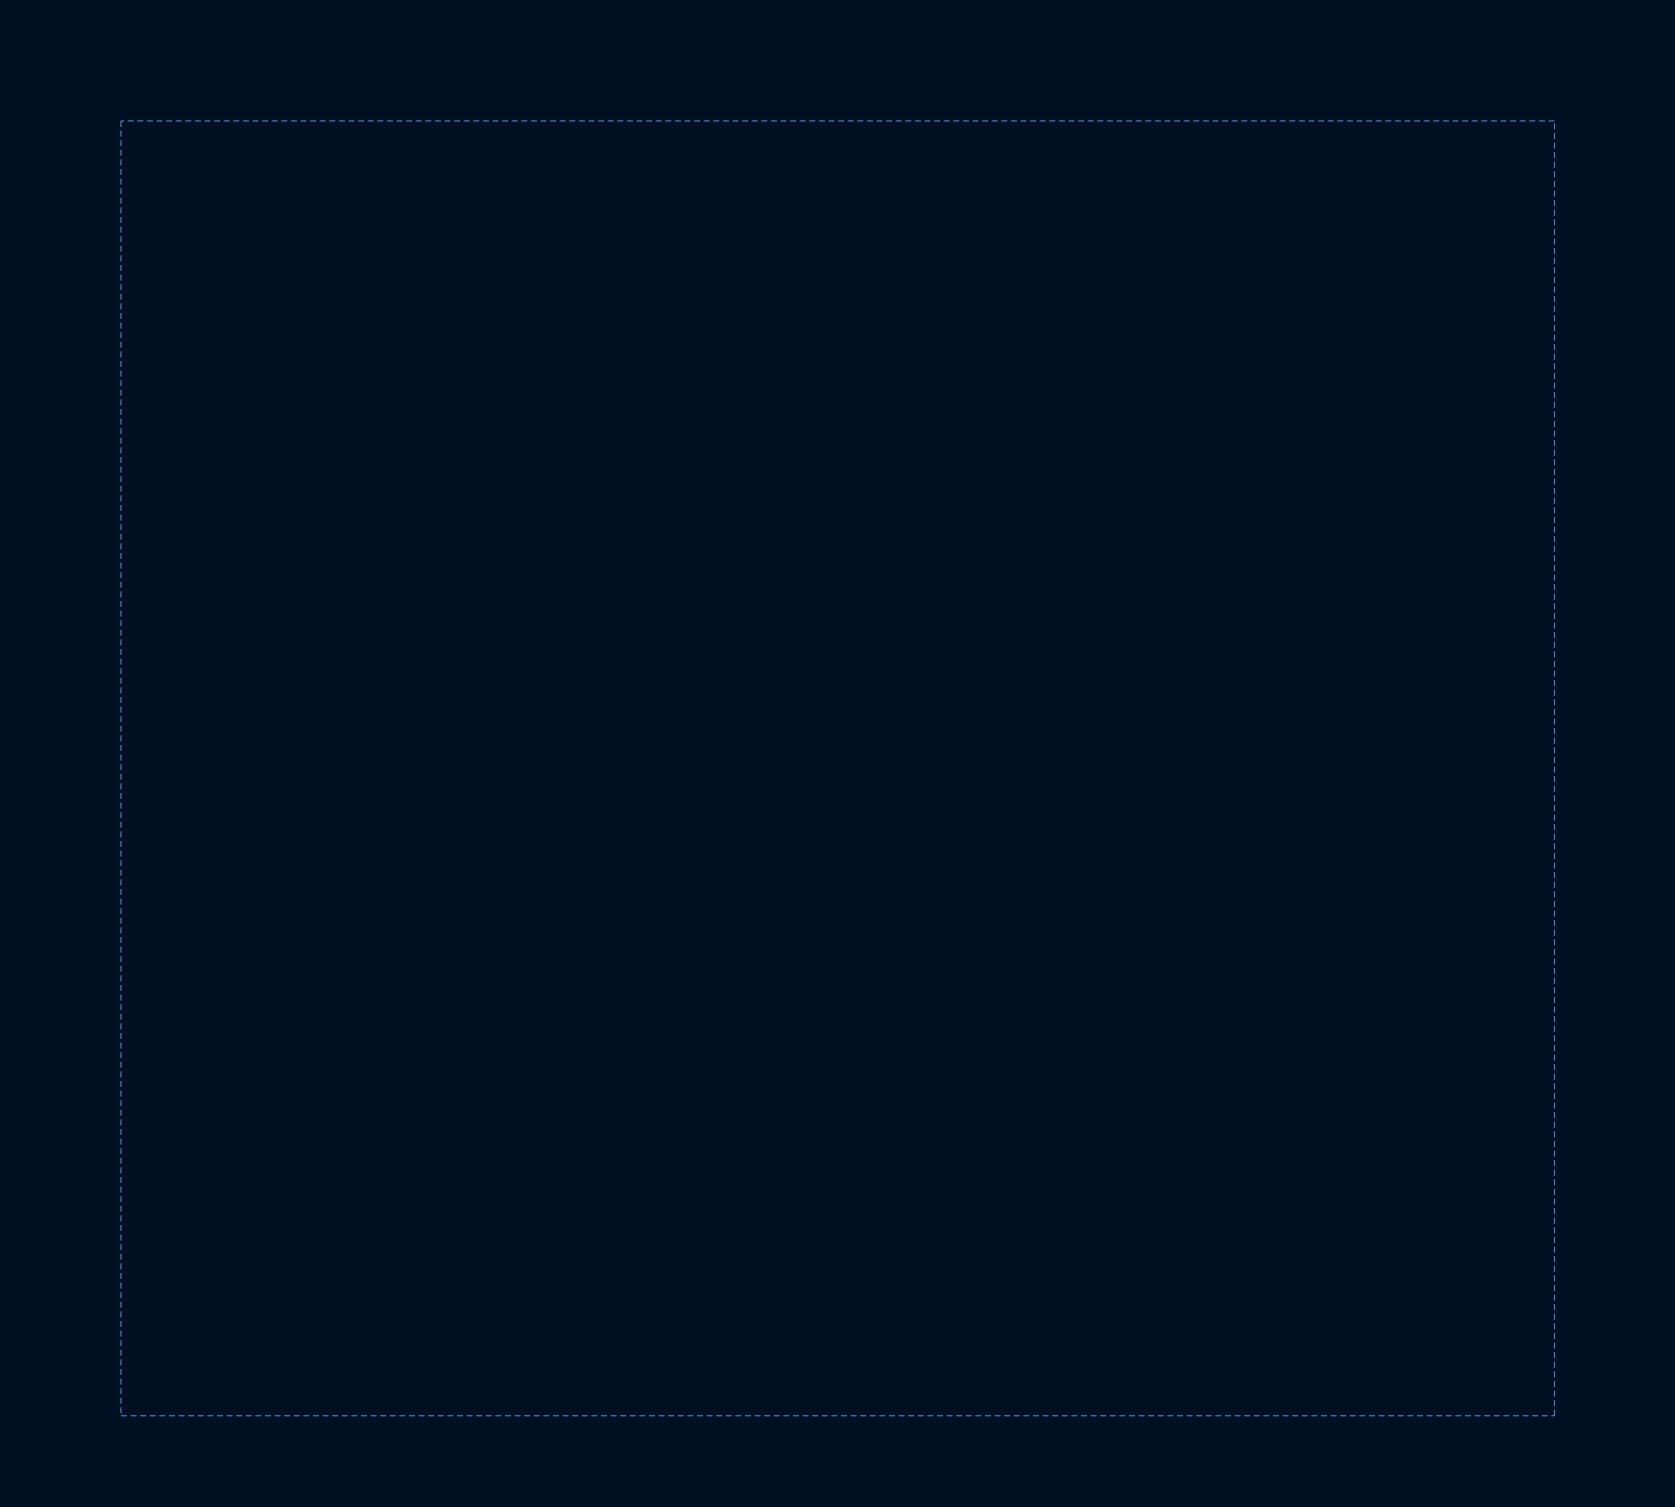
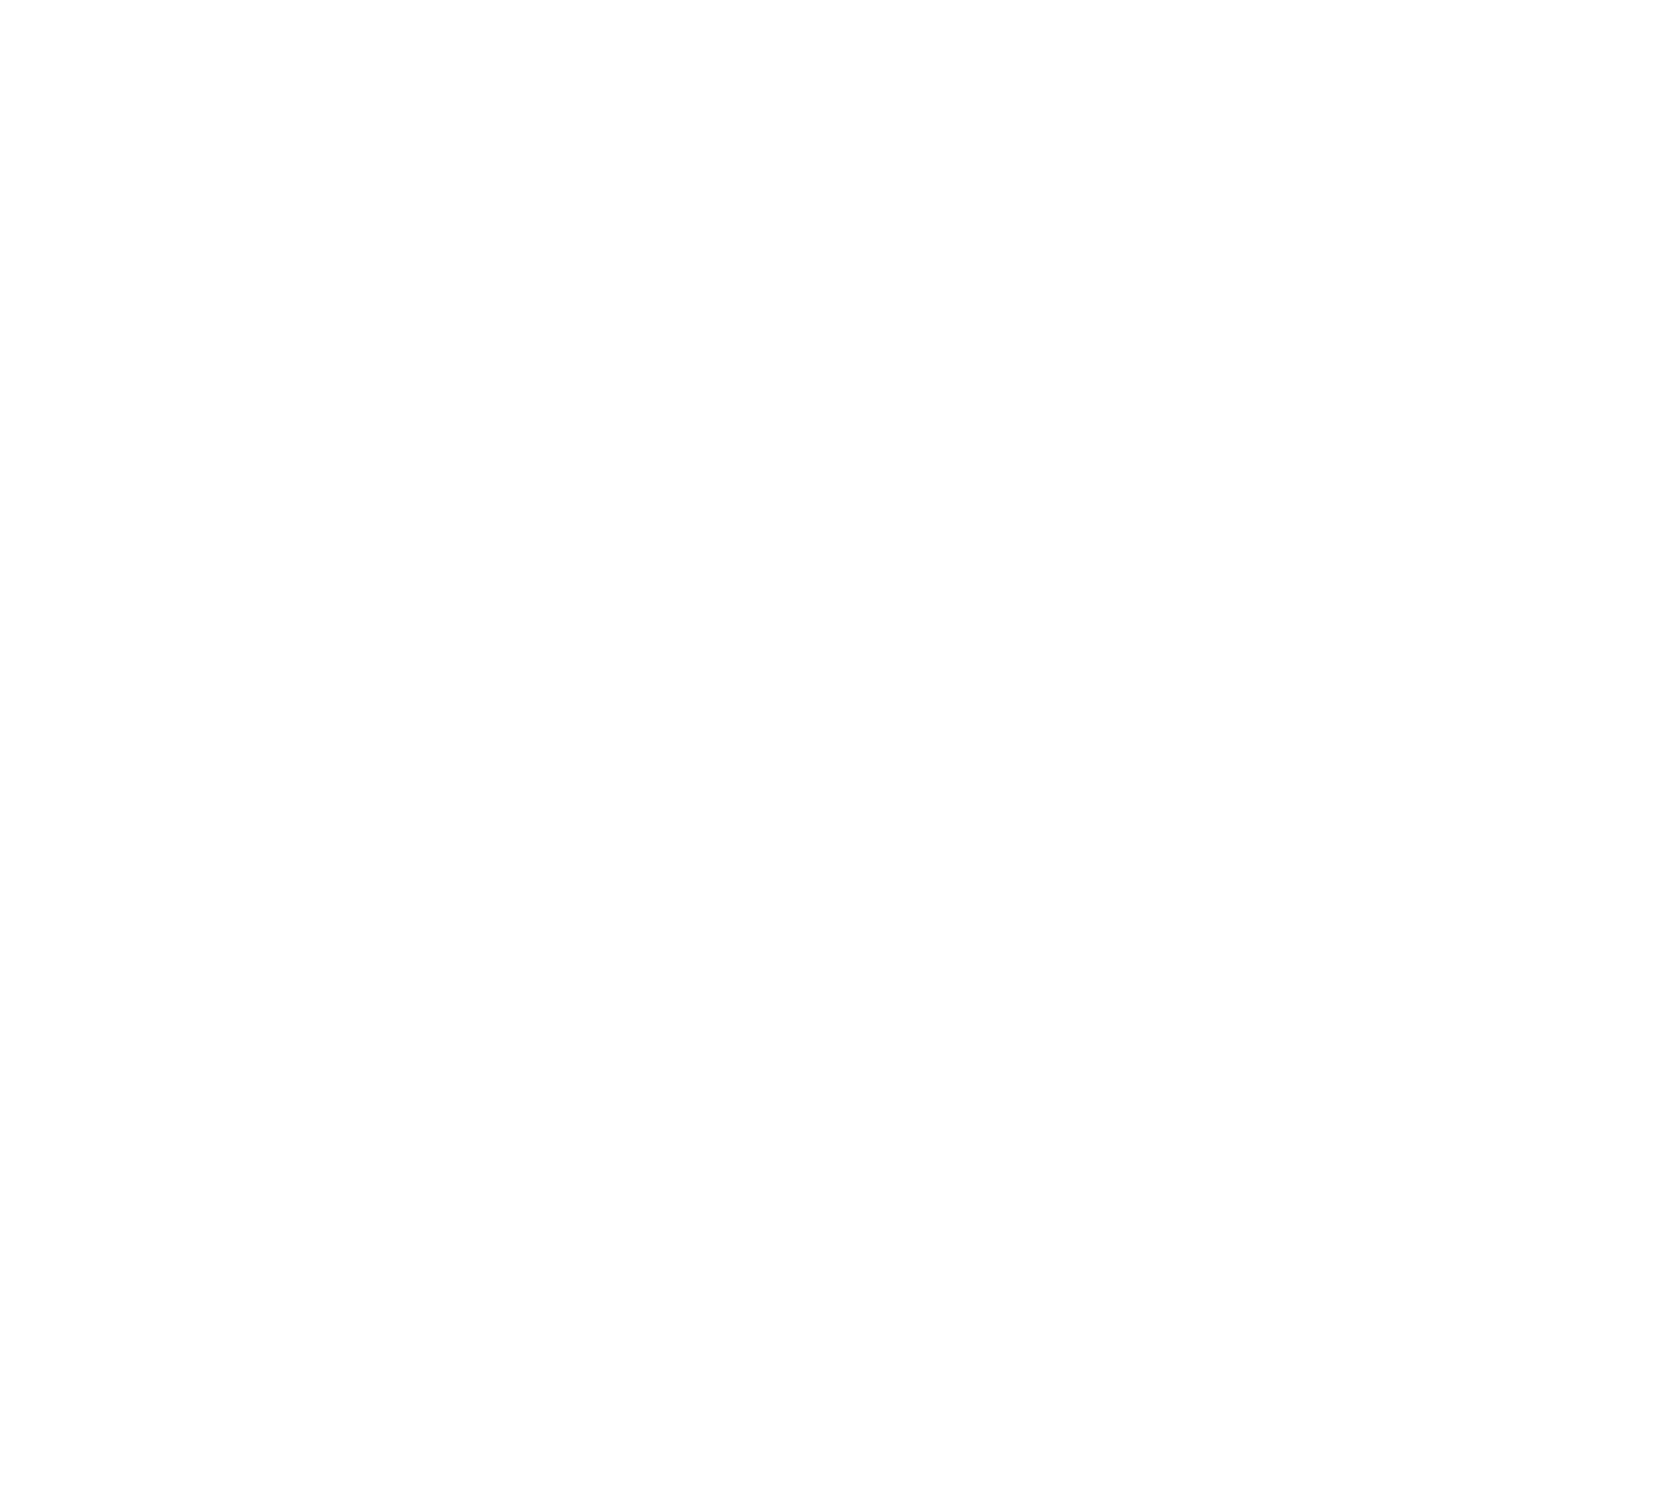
bottom zone outline: (120, 120) (120, 1415) (1554, 1415) (1554, 120) (120, 120) -> none

